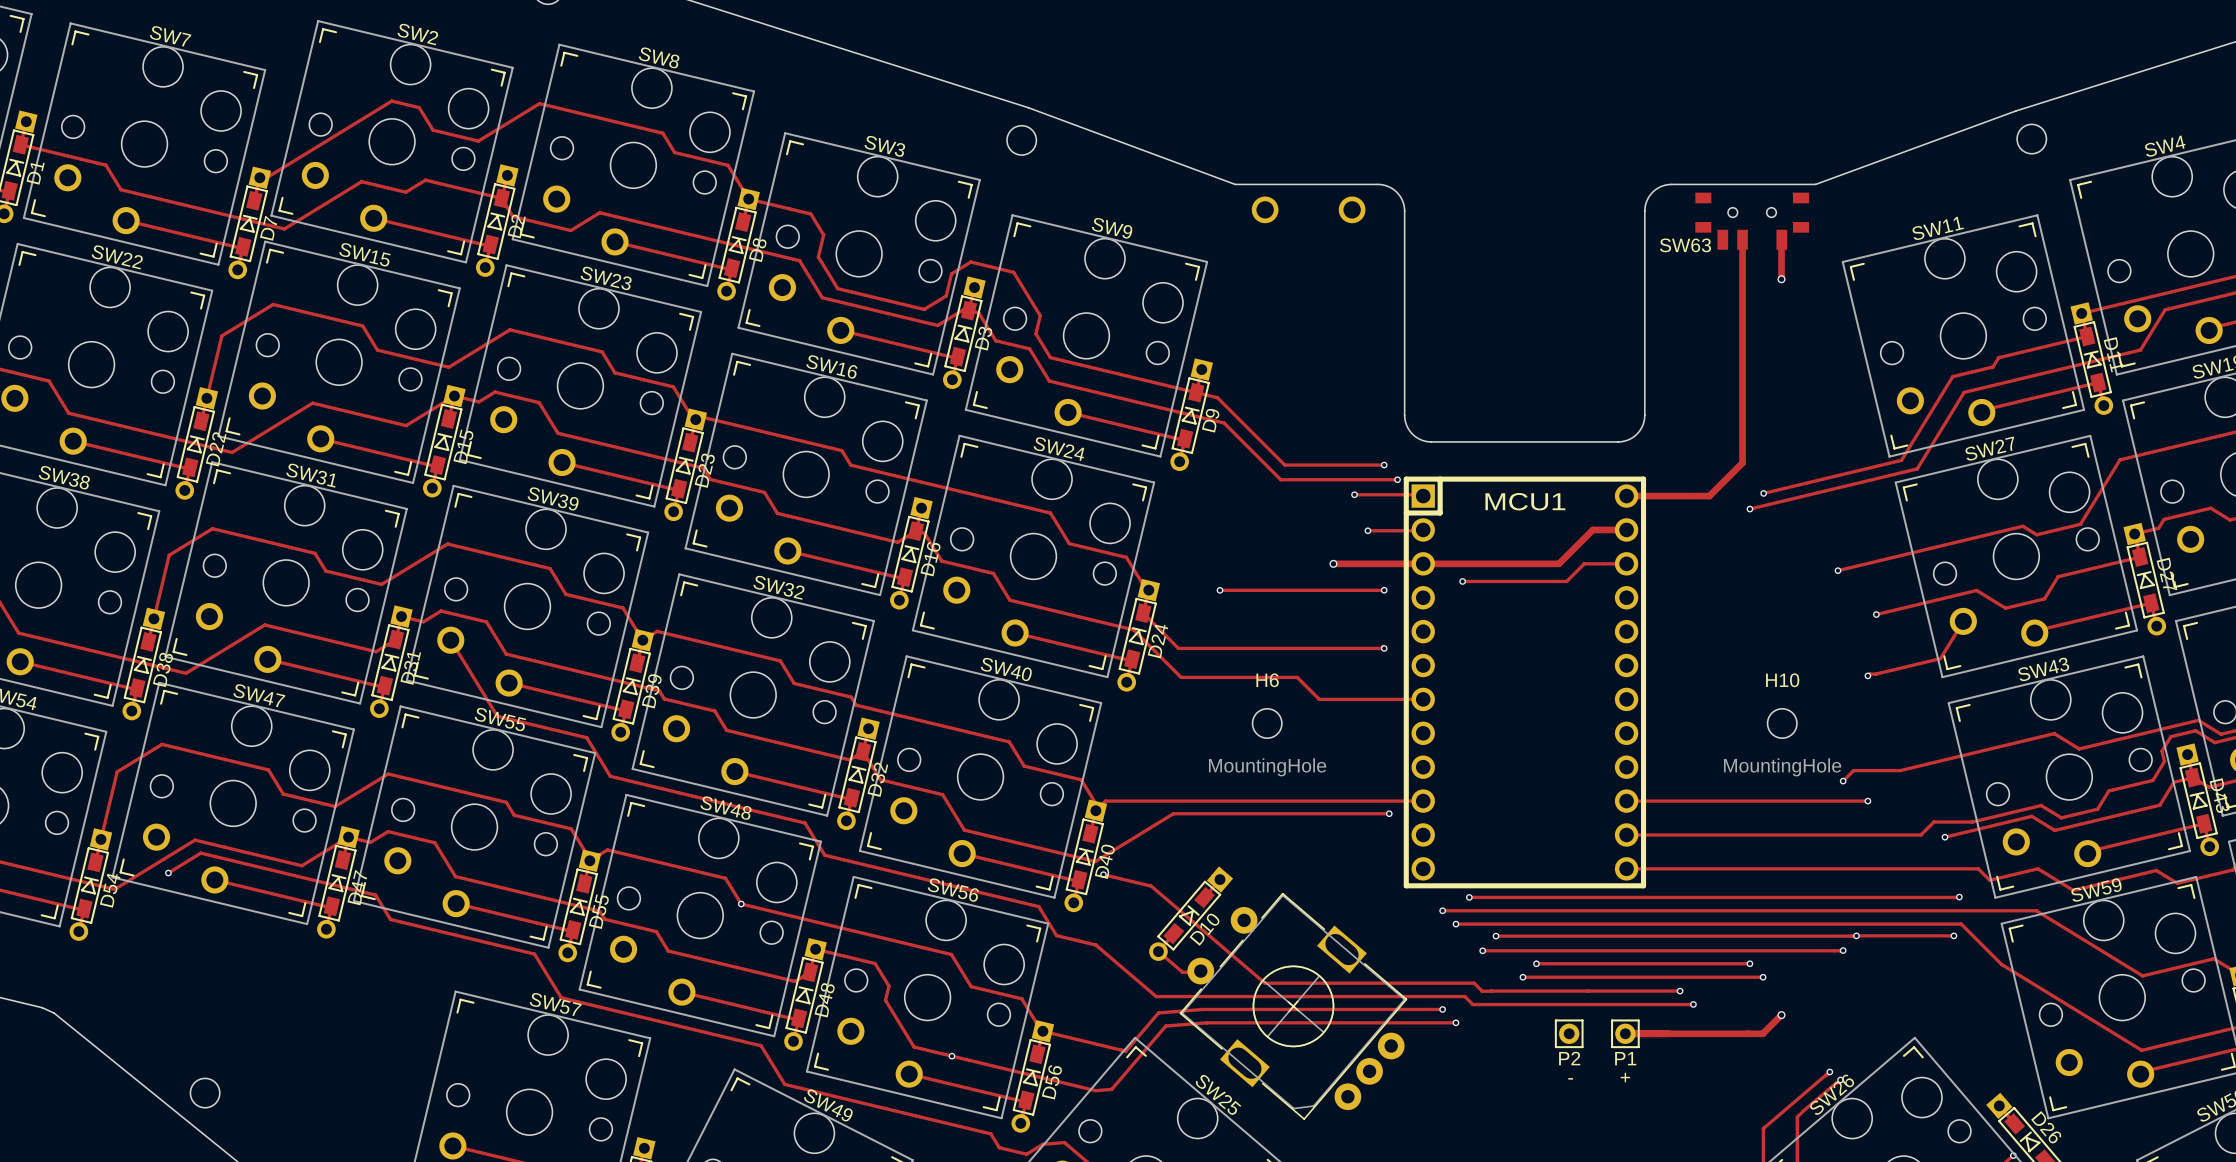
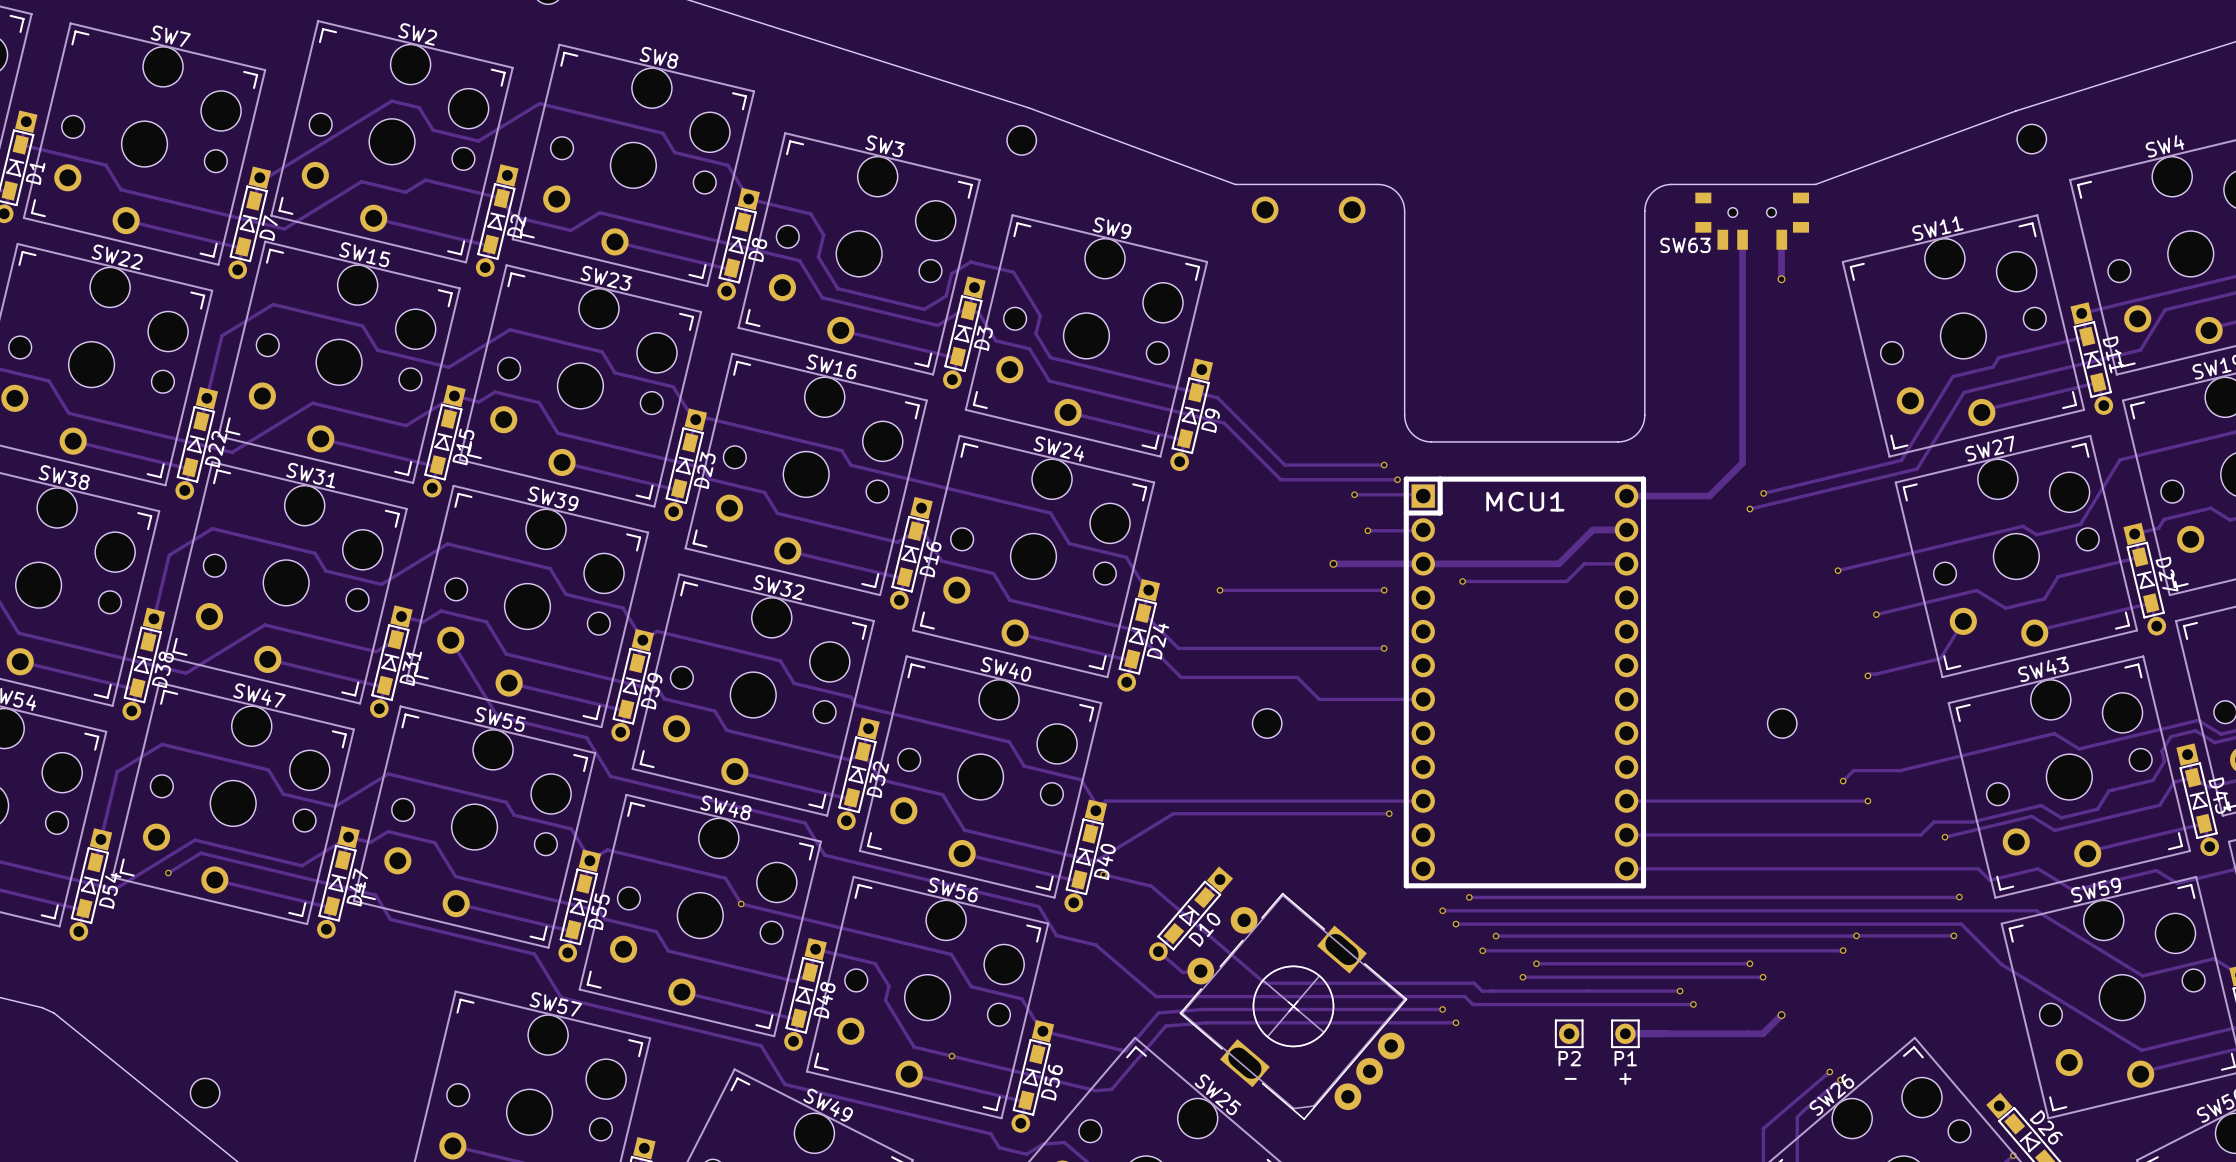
H6 name: H6 (1267, 680) -> none
H10 name: H10 (1782, 680) -> none
H6 value: MountingHole (1267, 767) -> none
H10 value: MountingHole (1782, 767) -> none

